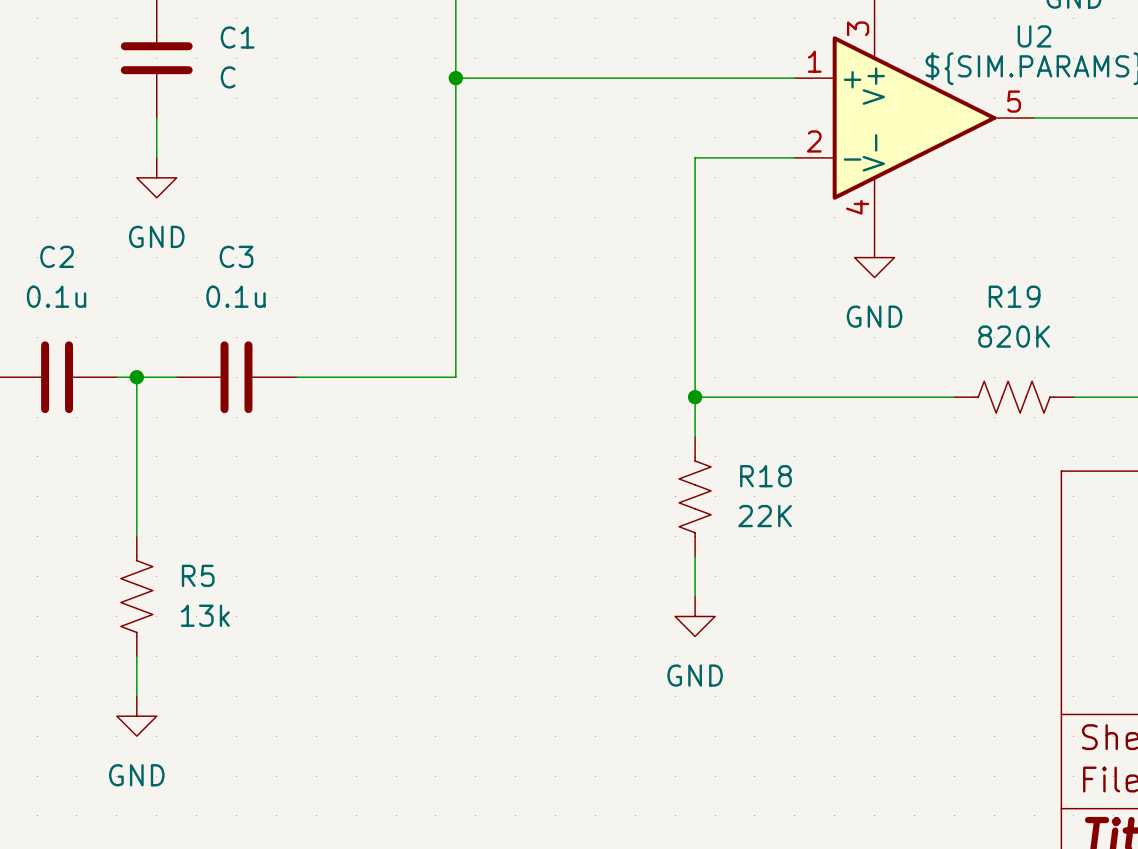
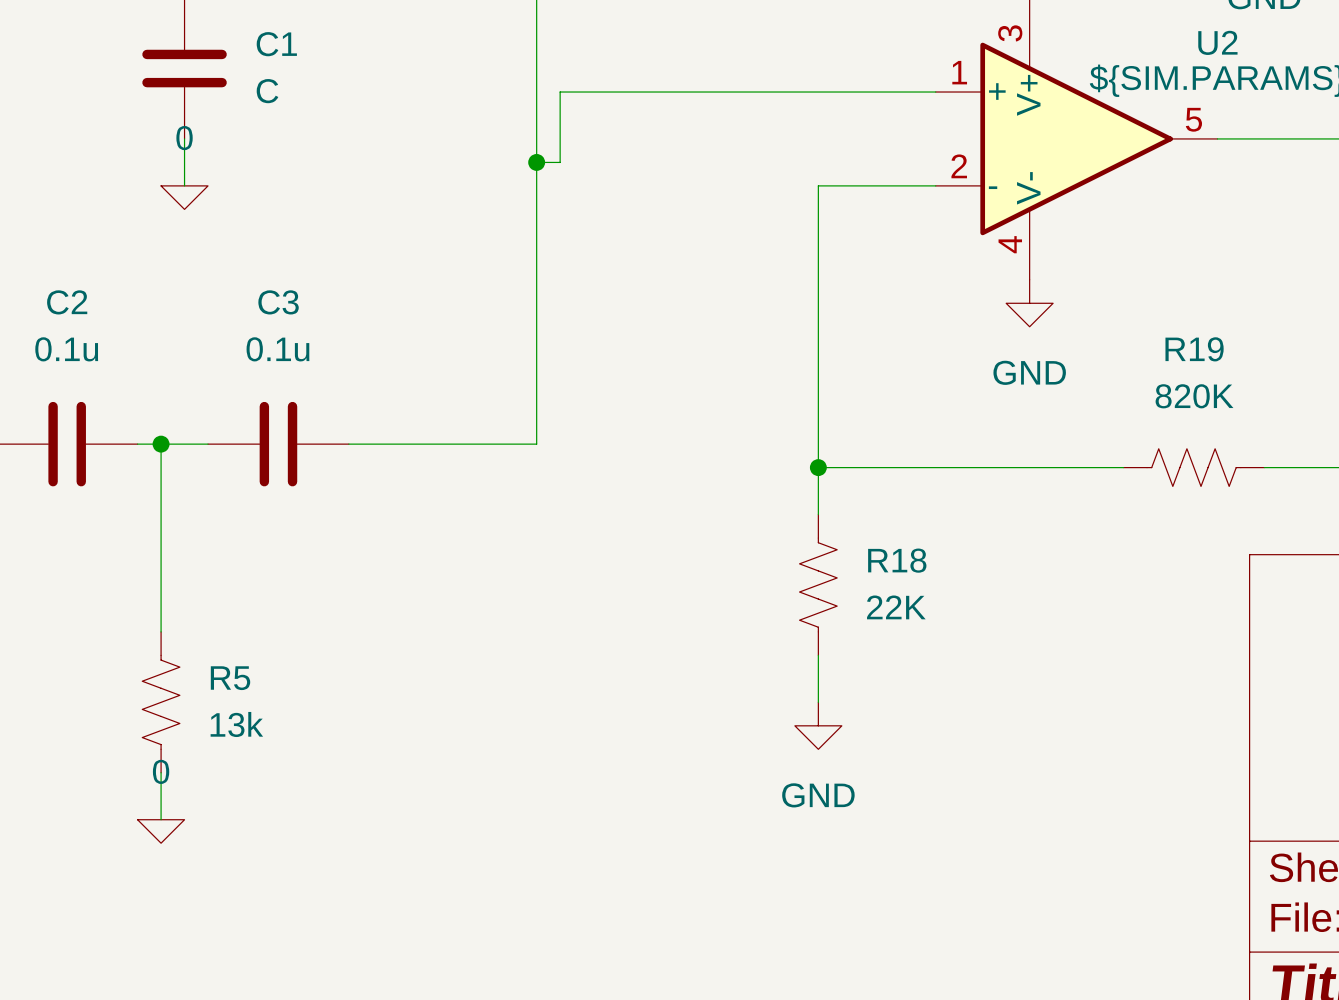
wire: (455, 78) (475, 78) -> (536, 162) (560, 162) (560, 92)
junction position: (455, 78) -> (536, 162)
power symbol: GND (156, 177) -> 0 (184, 197)
power symbol: GND (136, 716) -> 0 (161, 831)

